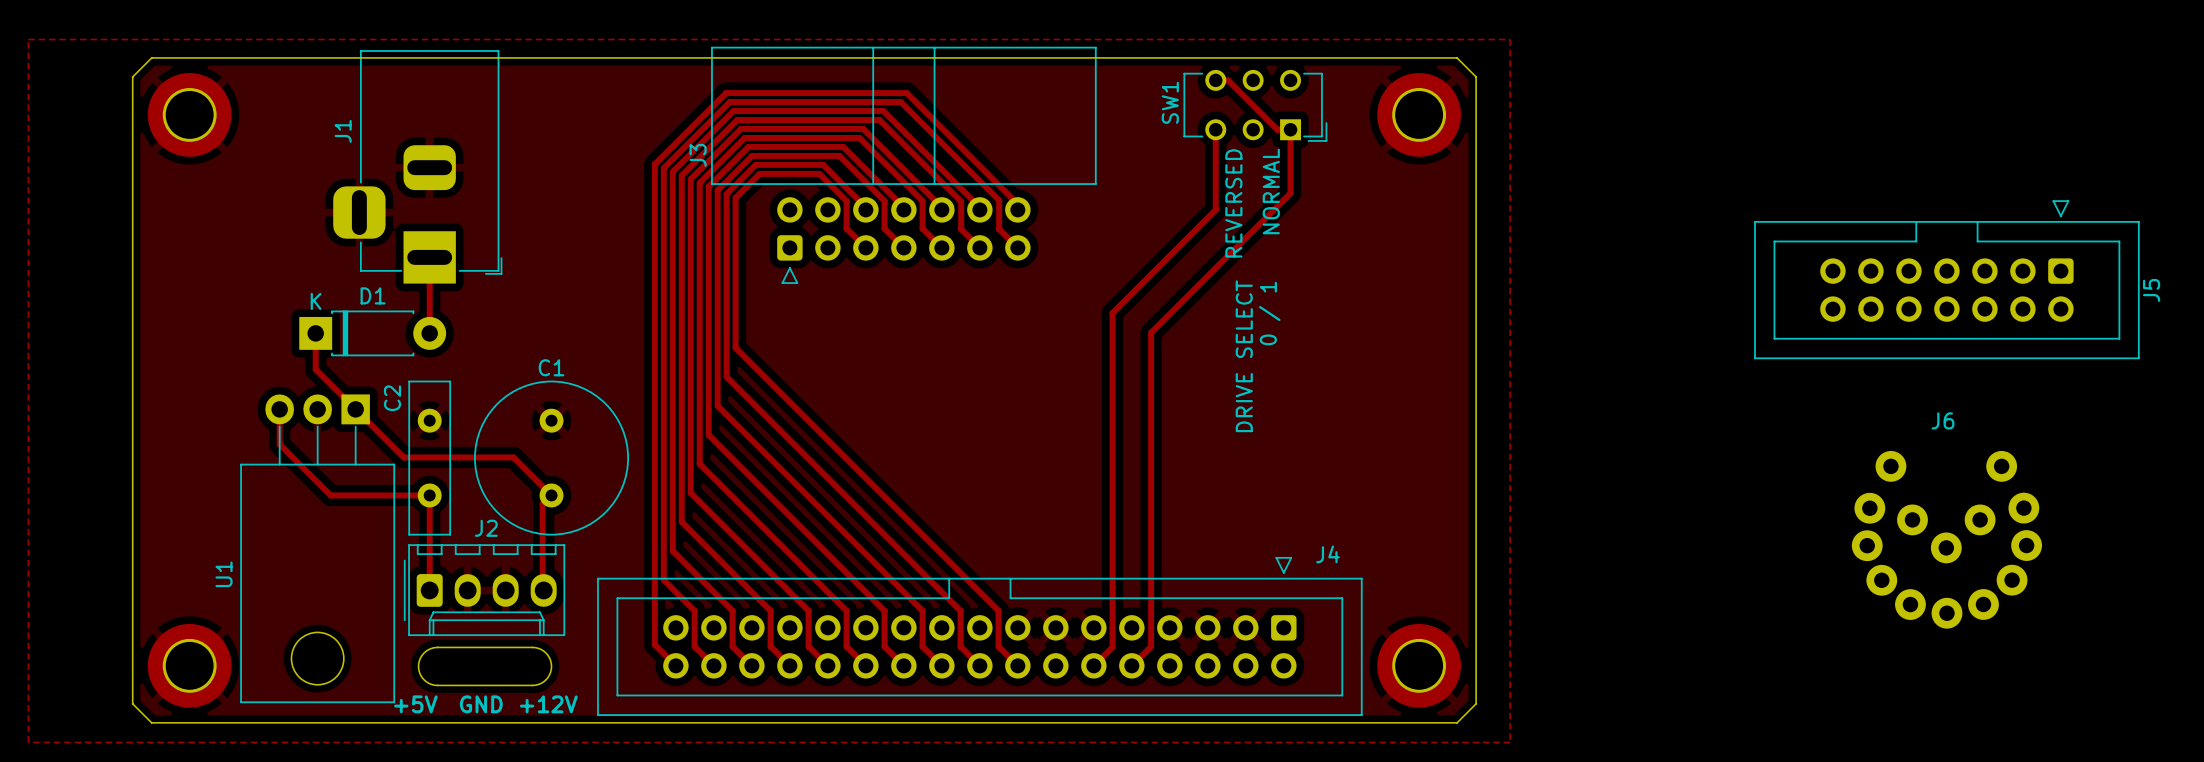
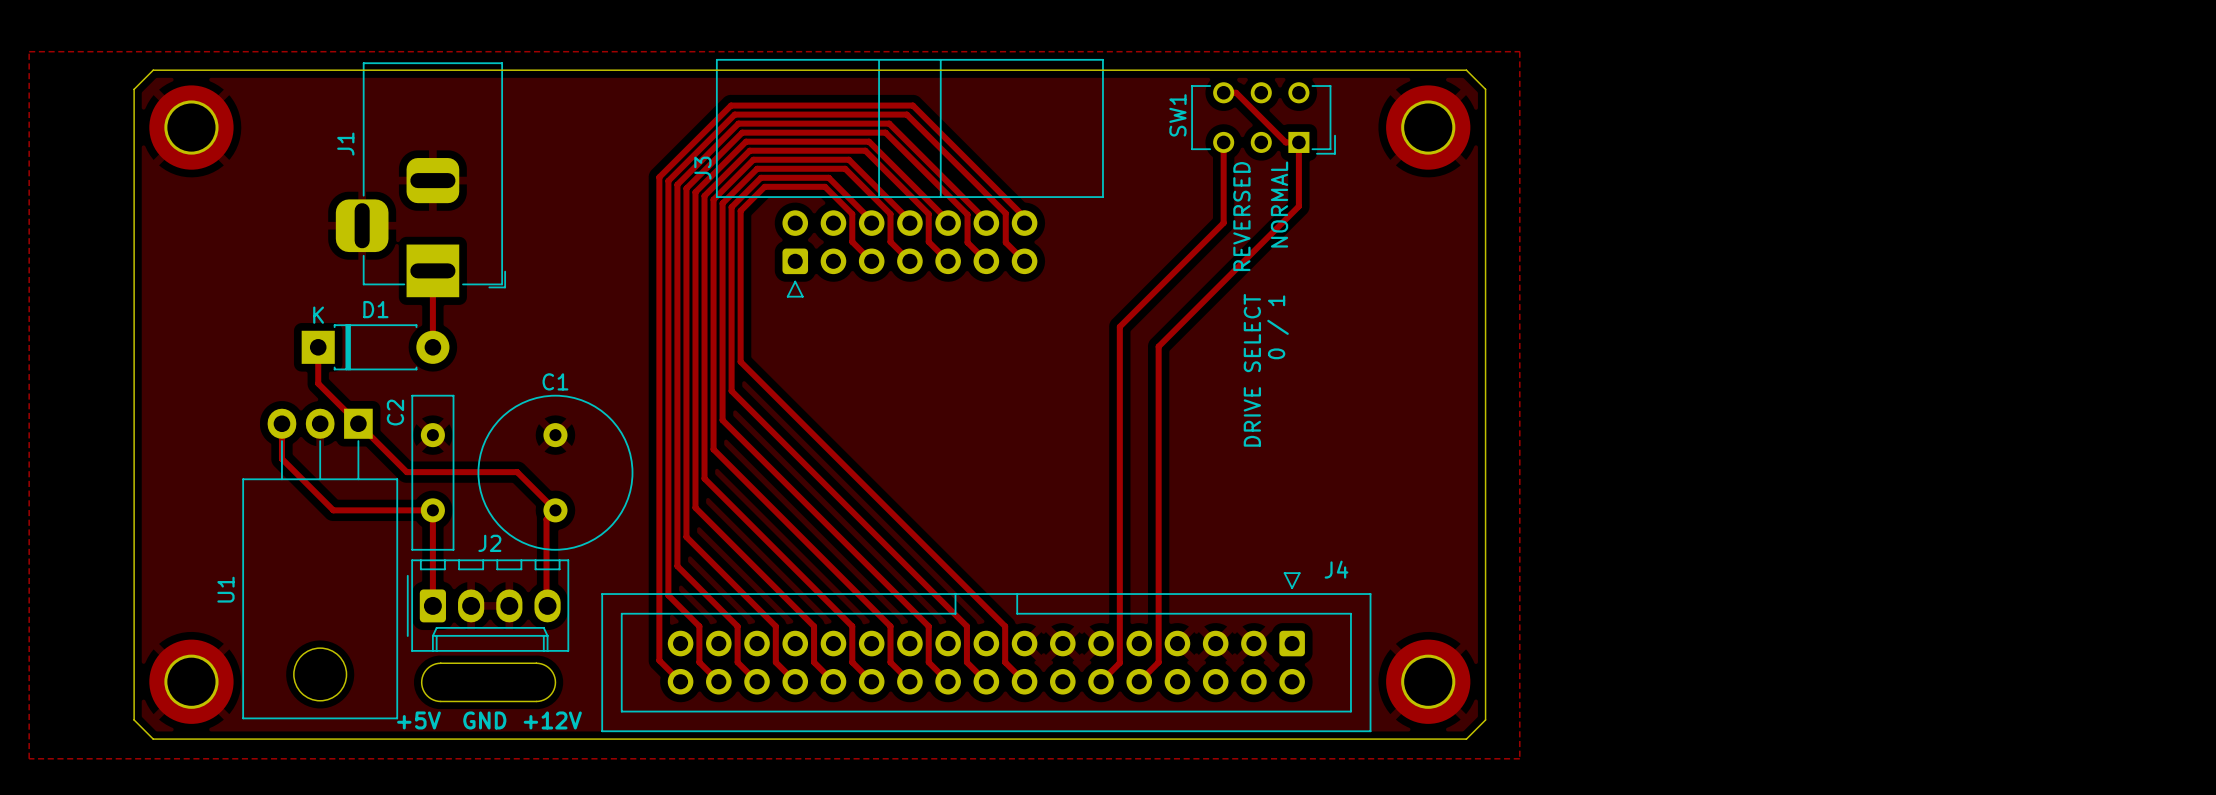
J5: (1946, 279) -> none
J6: (1946, 539) -> none

